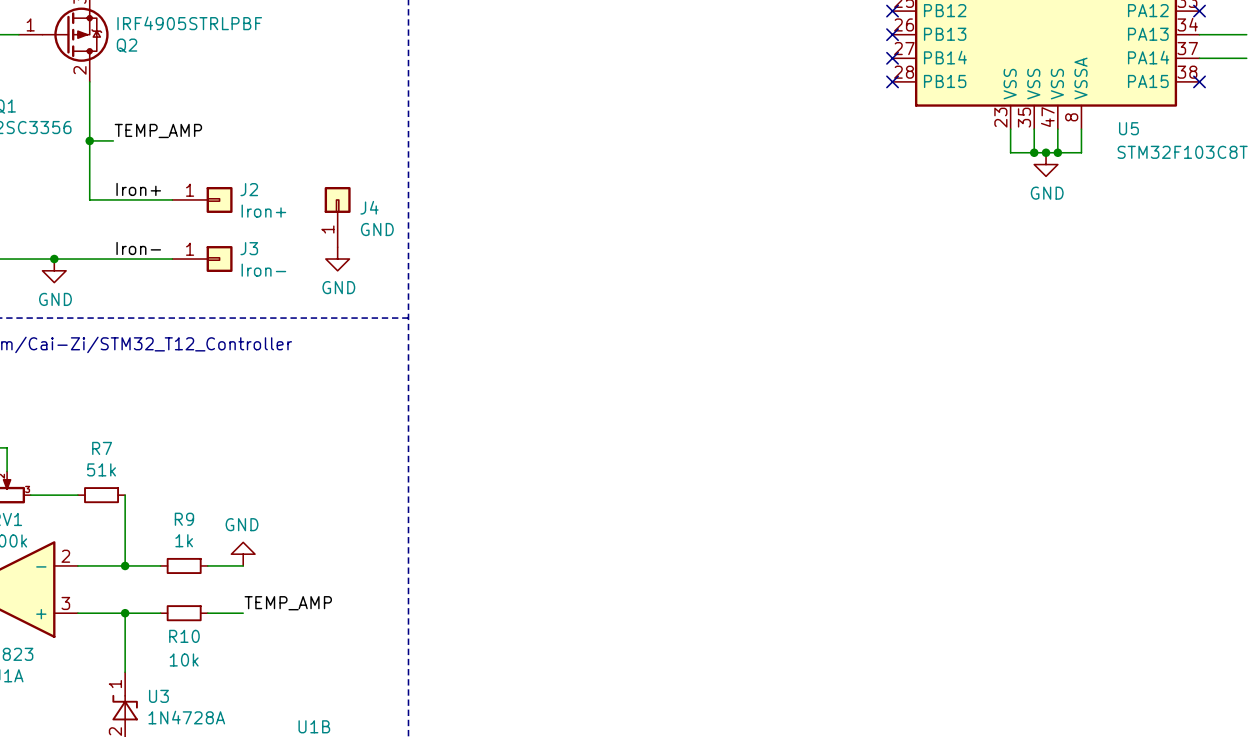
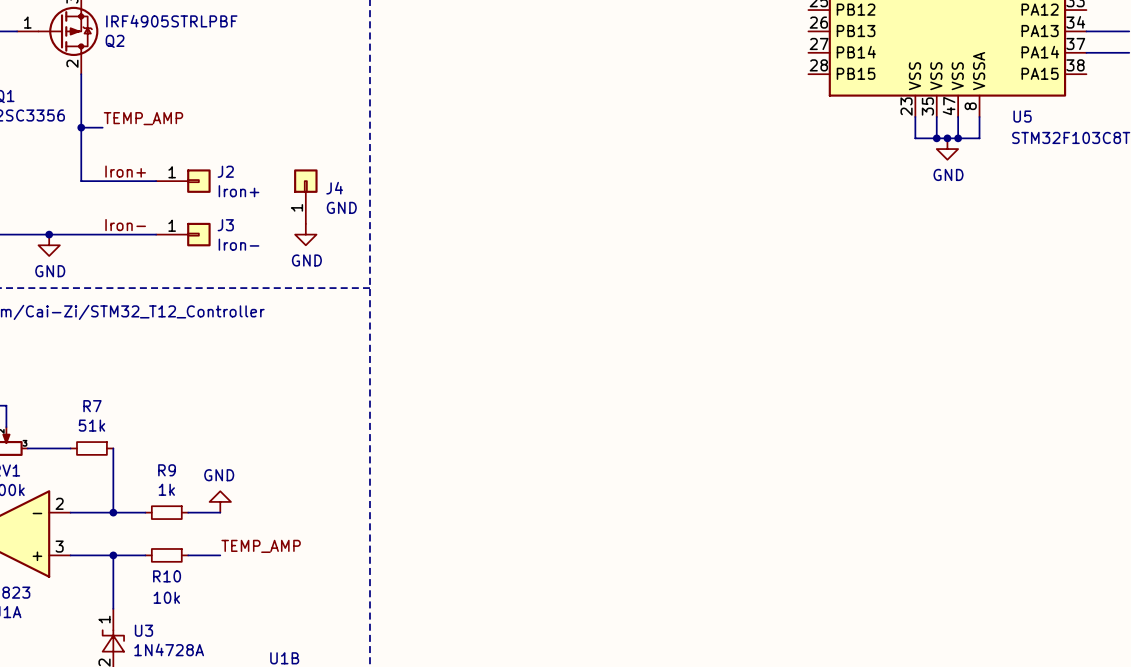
no-connect mark: (892, 11) -> none
no-connect mark: (1199, 11) -> none
no-connect mark: (892, 34) -> none
no-connect mark: (892, 58) -> none
no-connect mark: (892, 81) -> none
no-connect mark: (1199, 81) -> none

